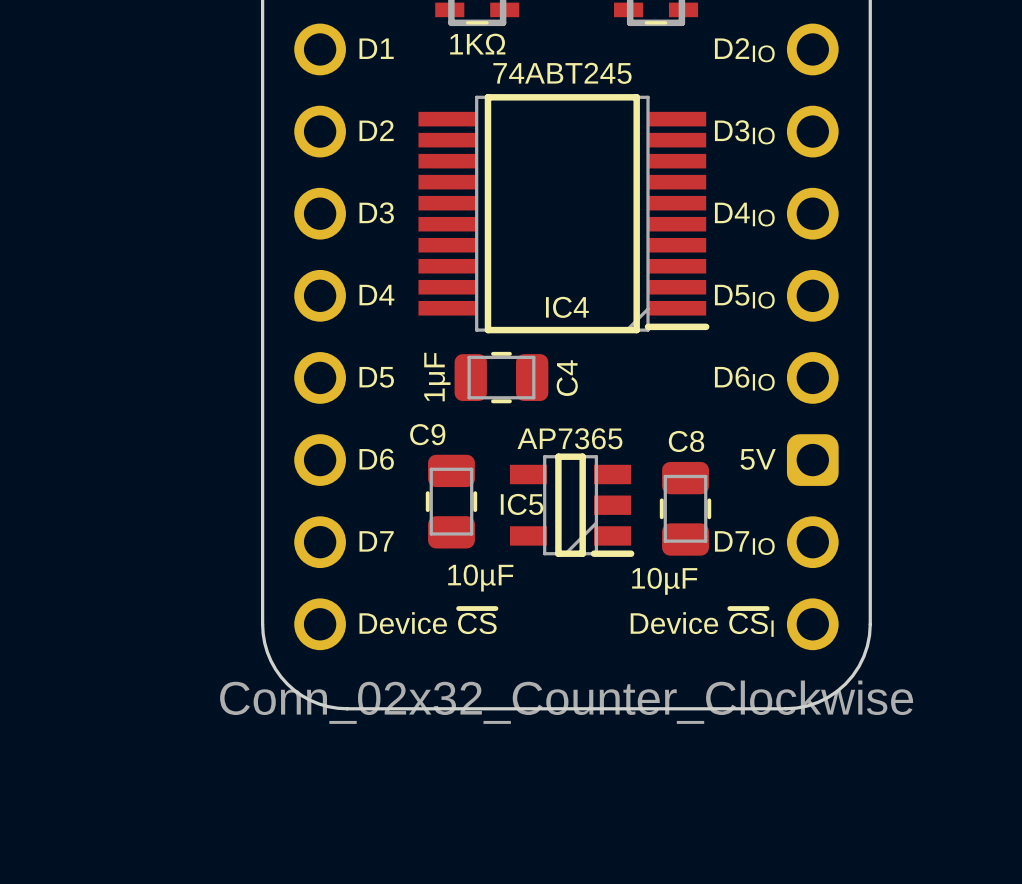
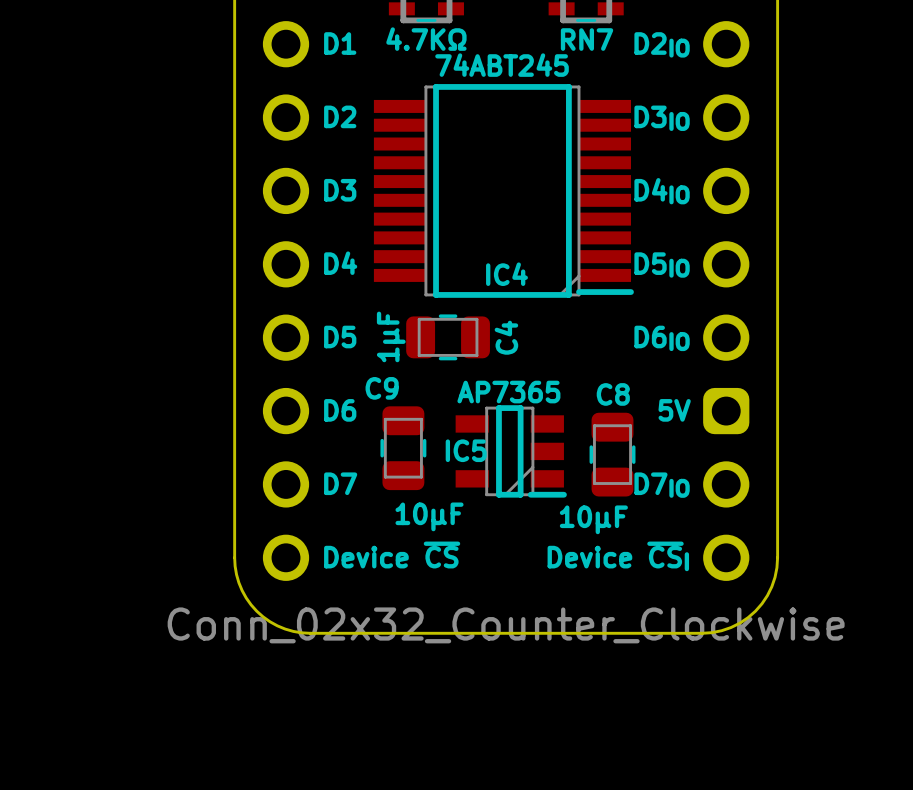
part text: 1KΩ (477, 44) -> 4.7KΩ (426, 39)
RN7 name: none -> RN7 (587, 39)

